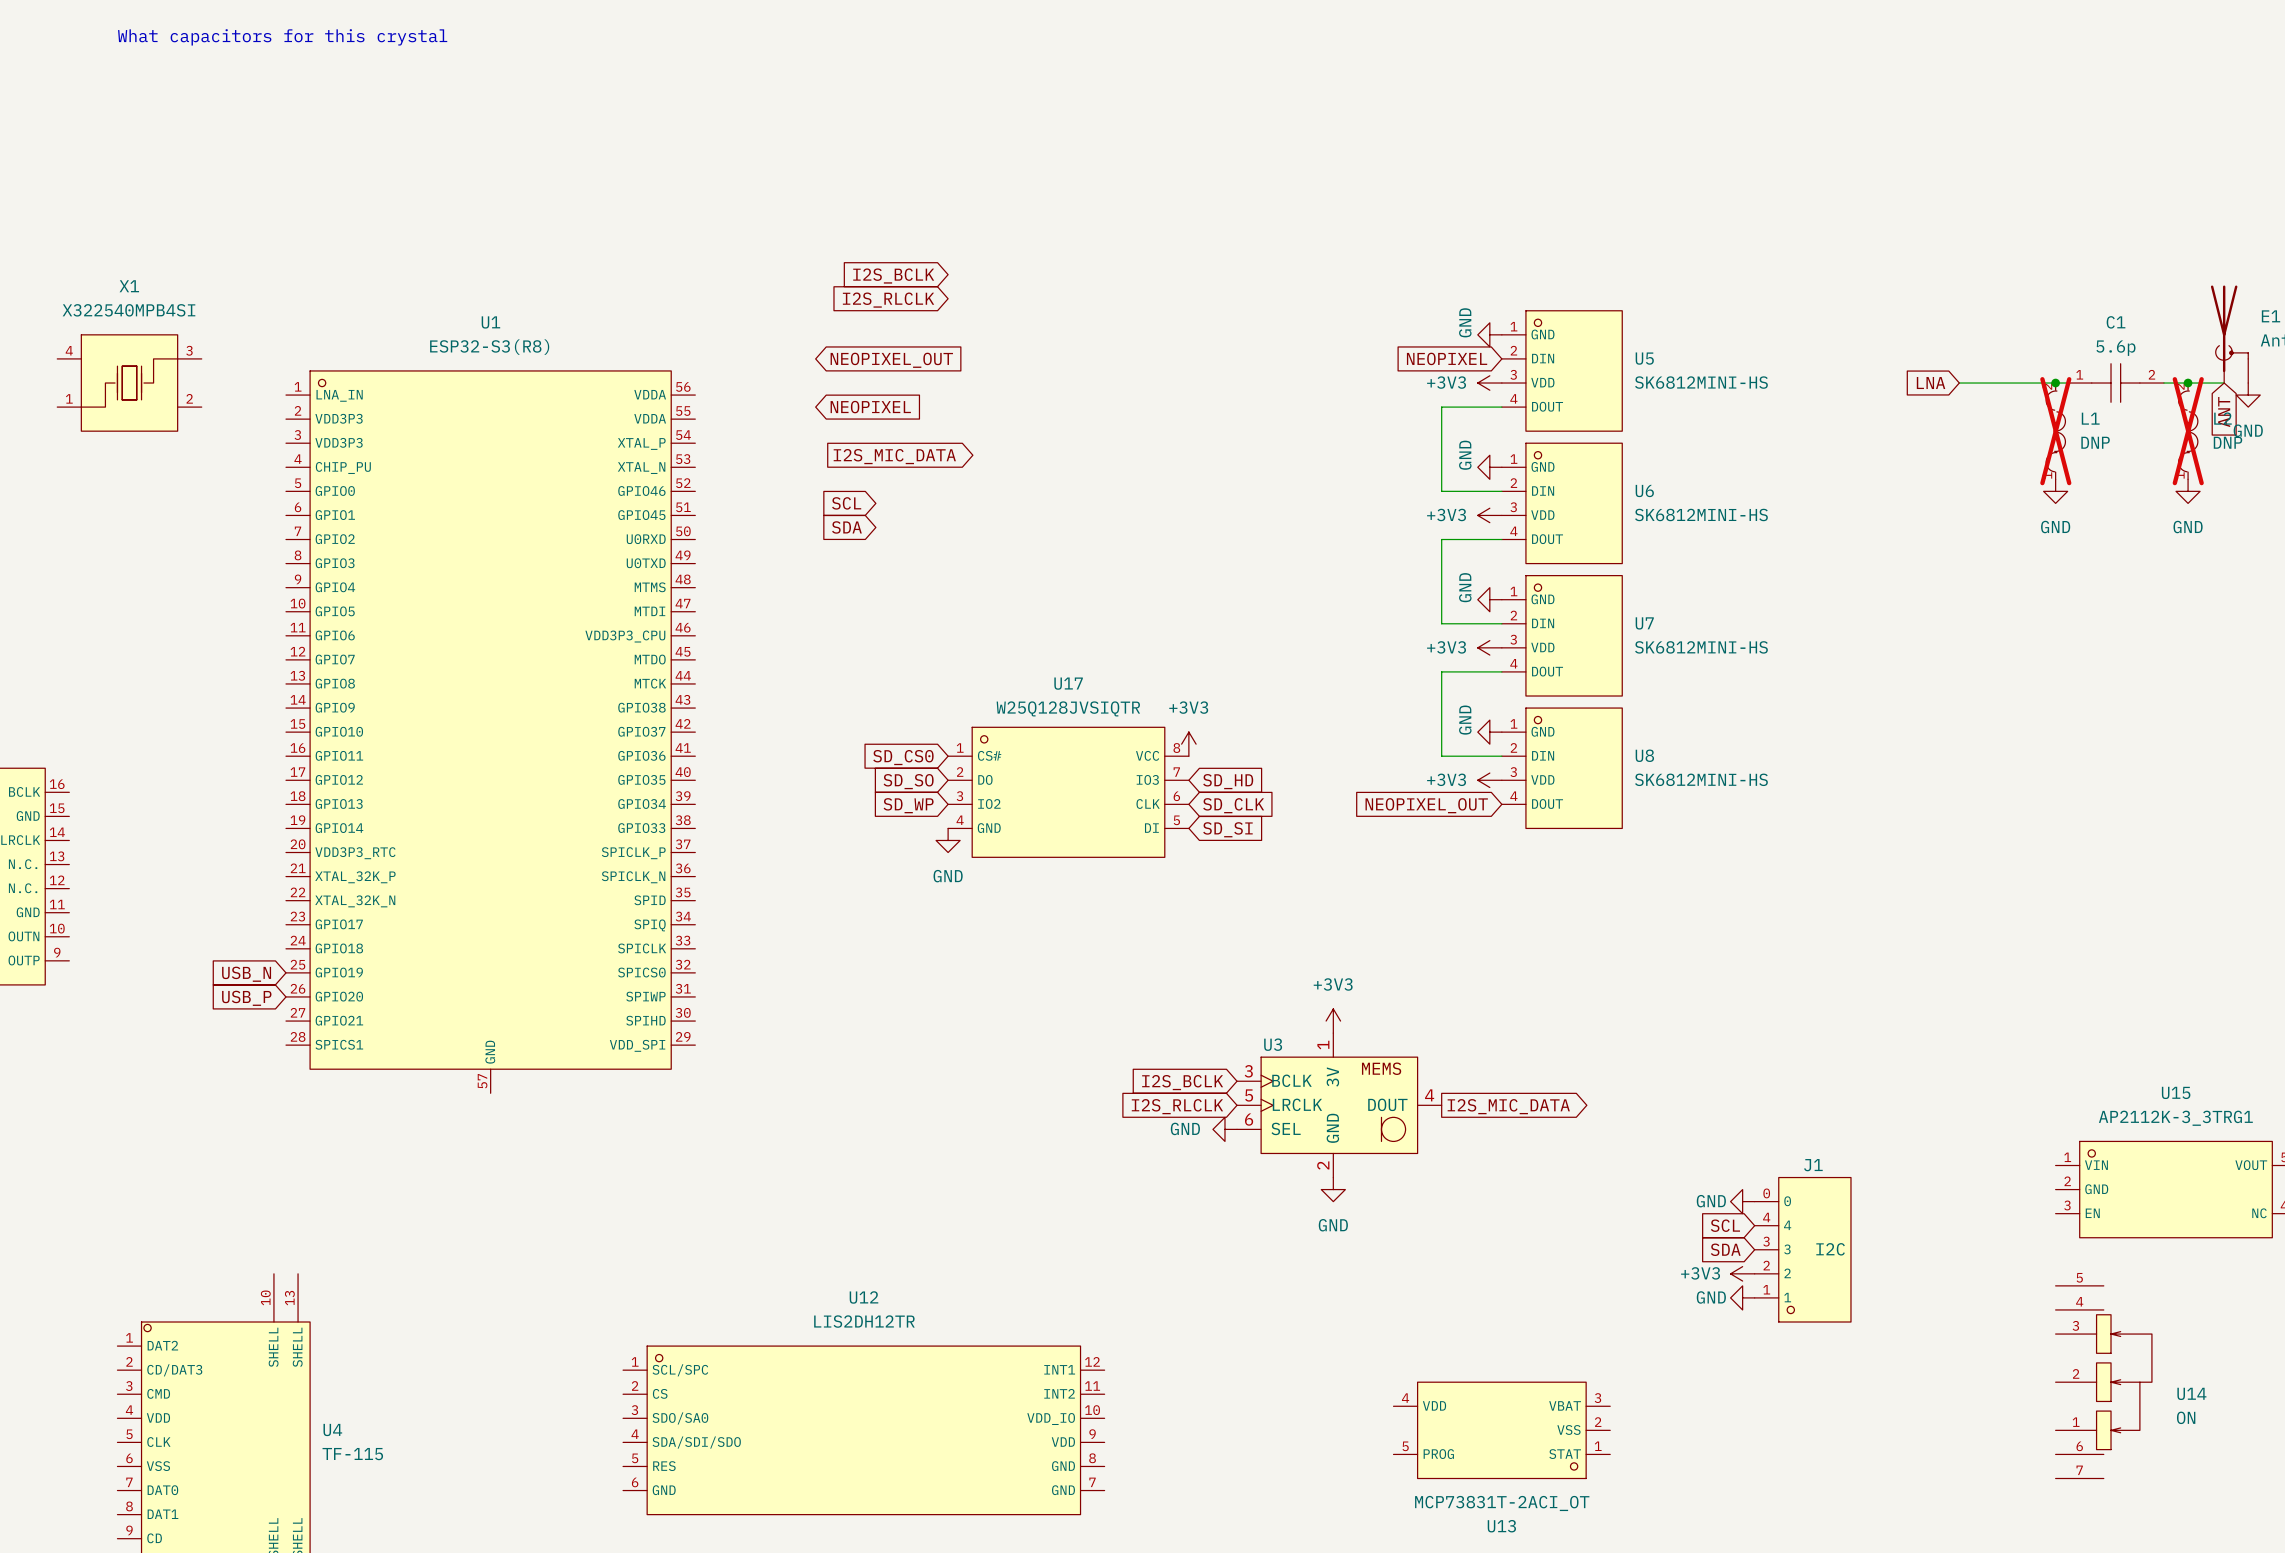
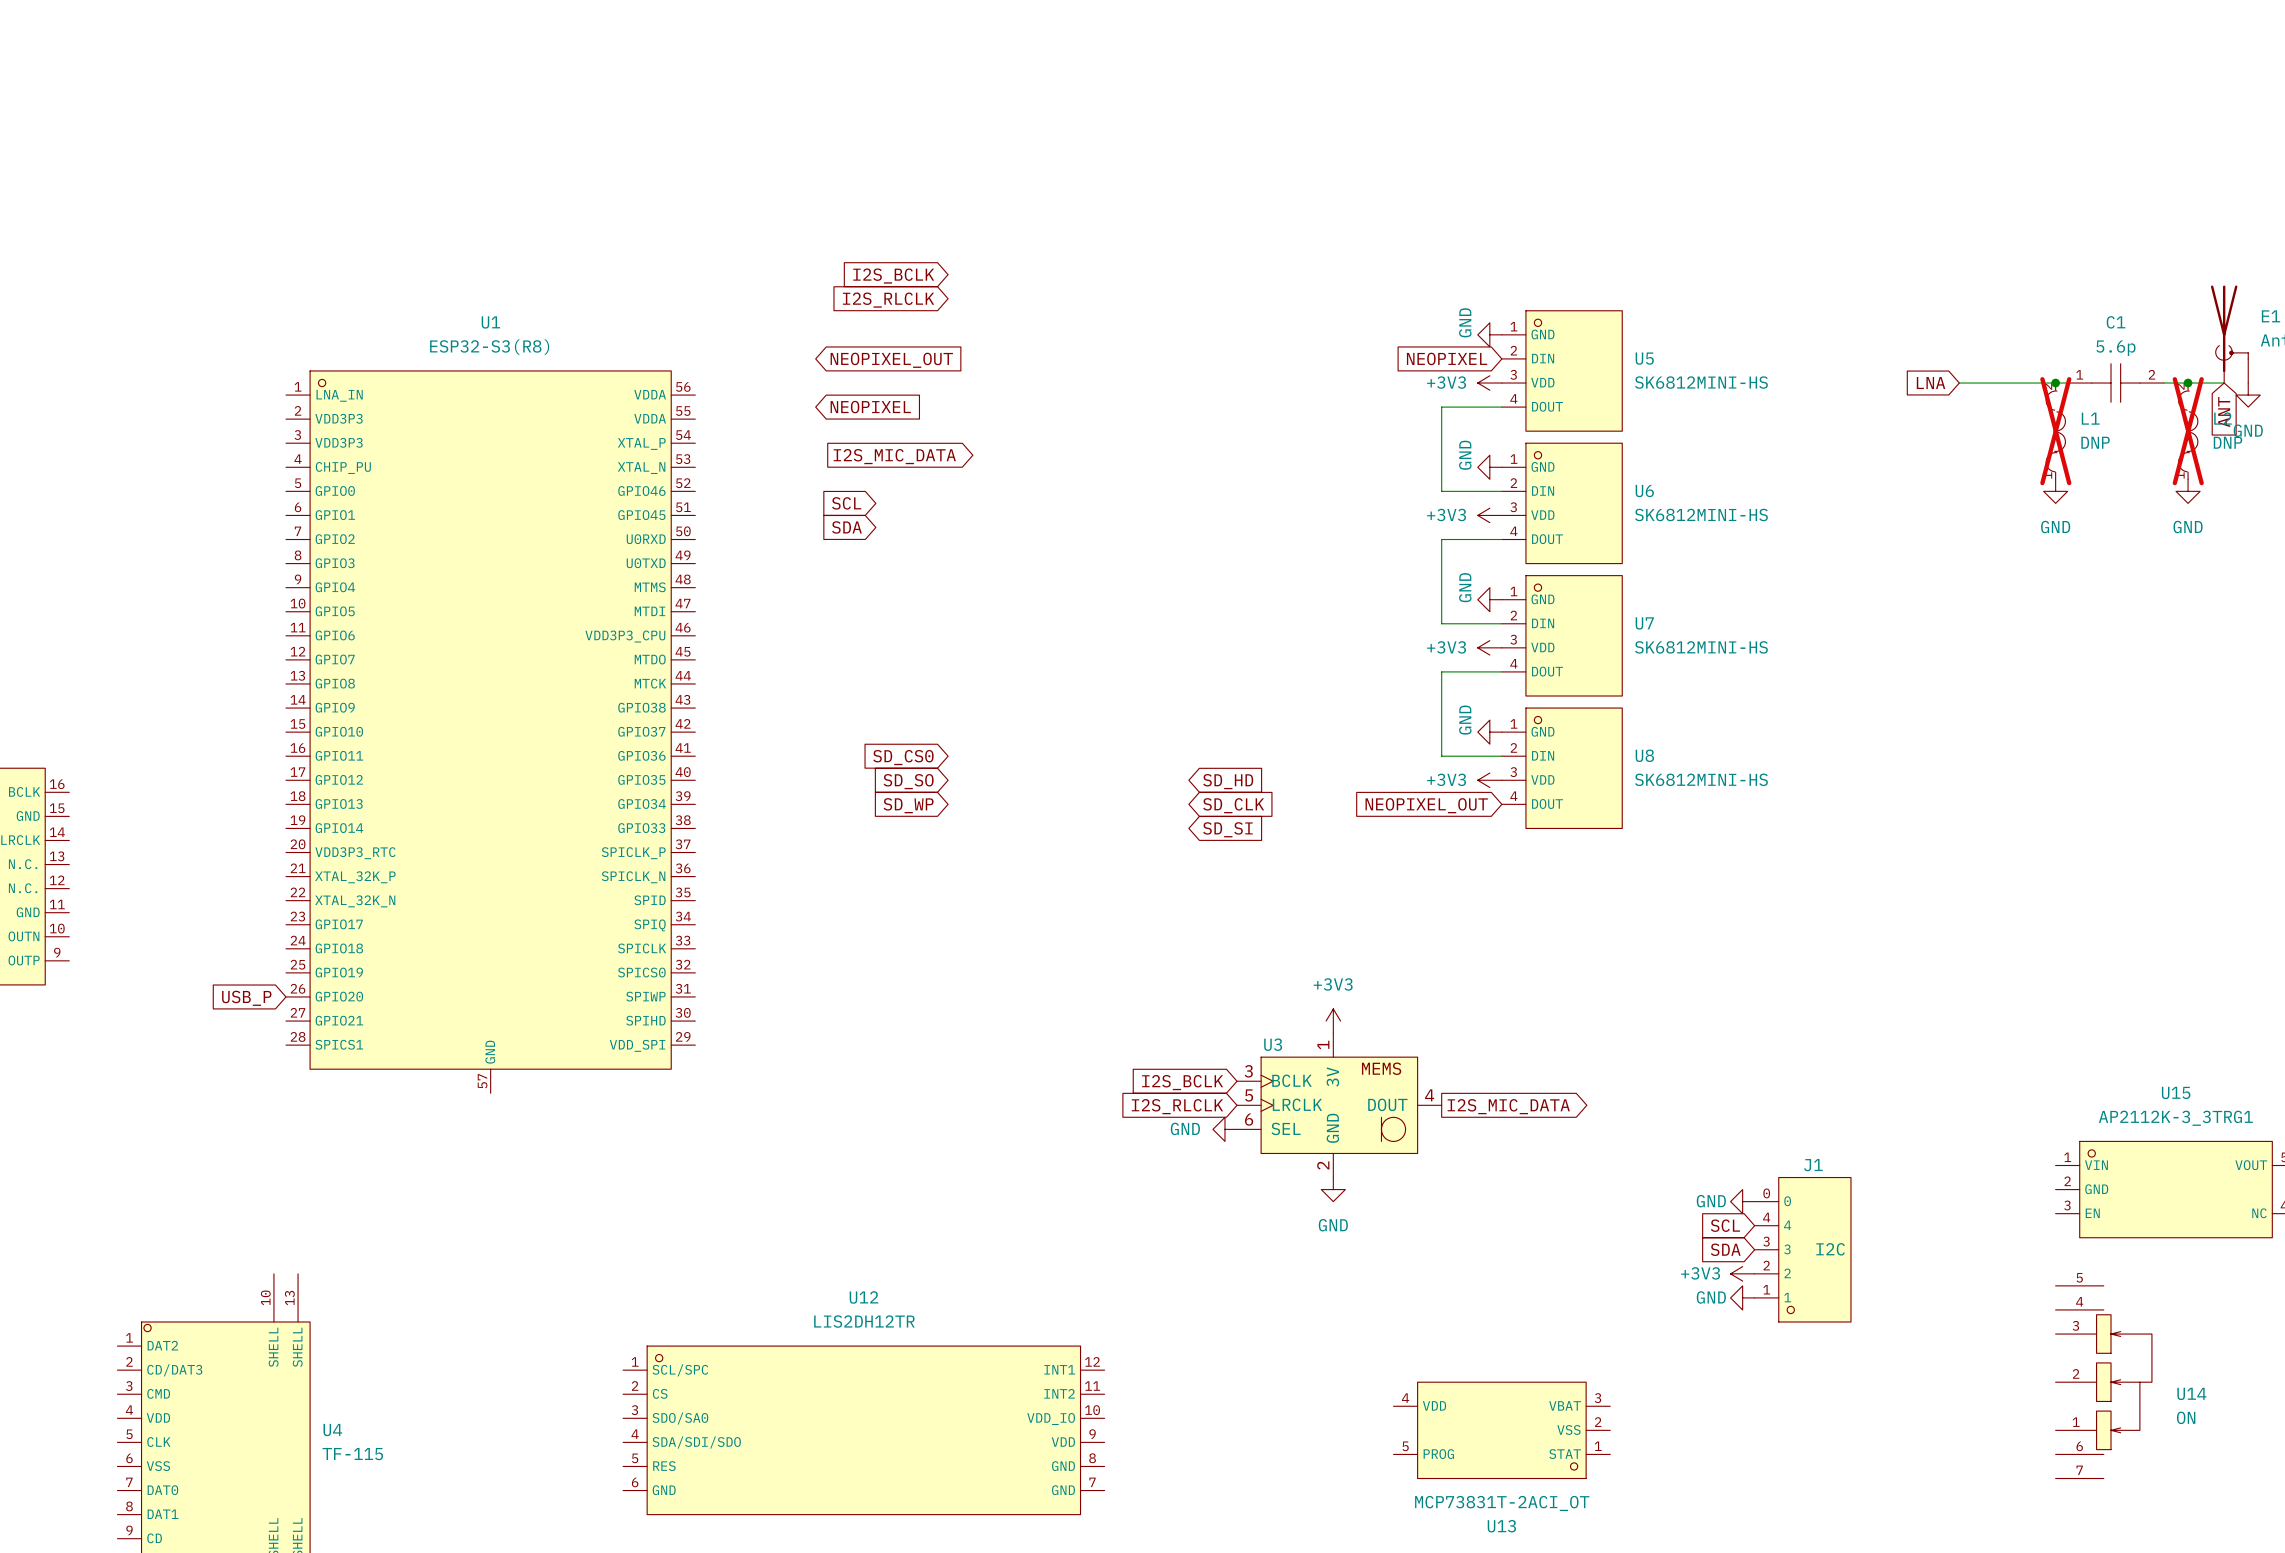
text: What capacitors for this crystal (282, 37) -> none
X1: X322540MPB4SI (129, 383) -> none
power symbol: +3V3 (1188, 744) -> none
U17: W25Q128JVSIQTR (1068, 792) -> none
power symbol: GND (948, 840) -> none
global label: USB_N (246, 974) -> none

